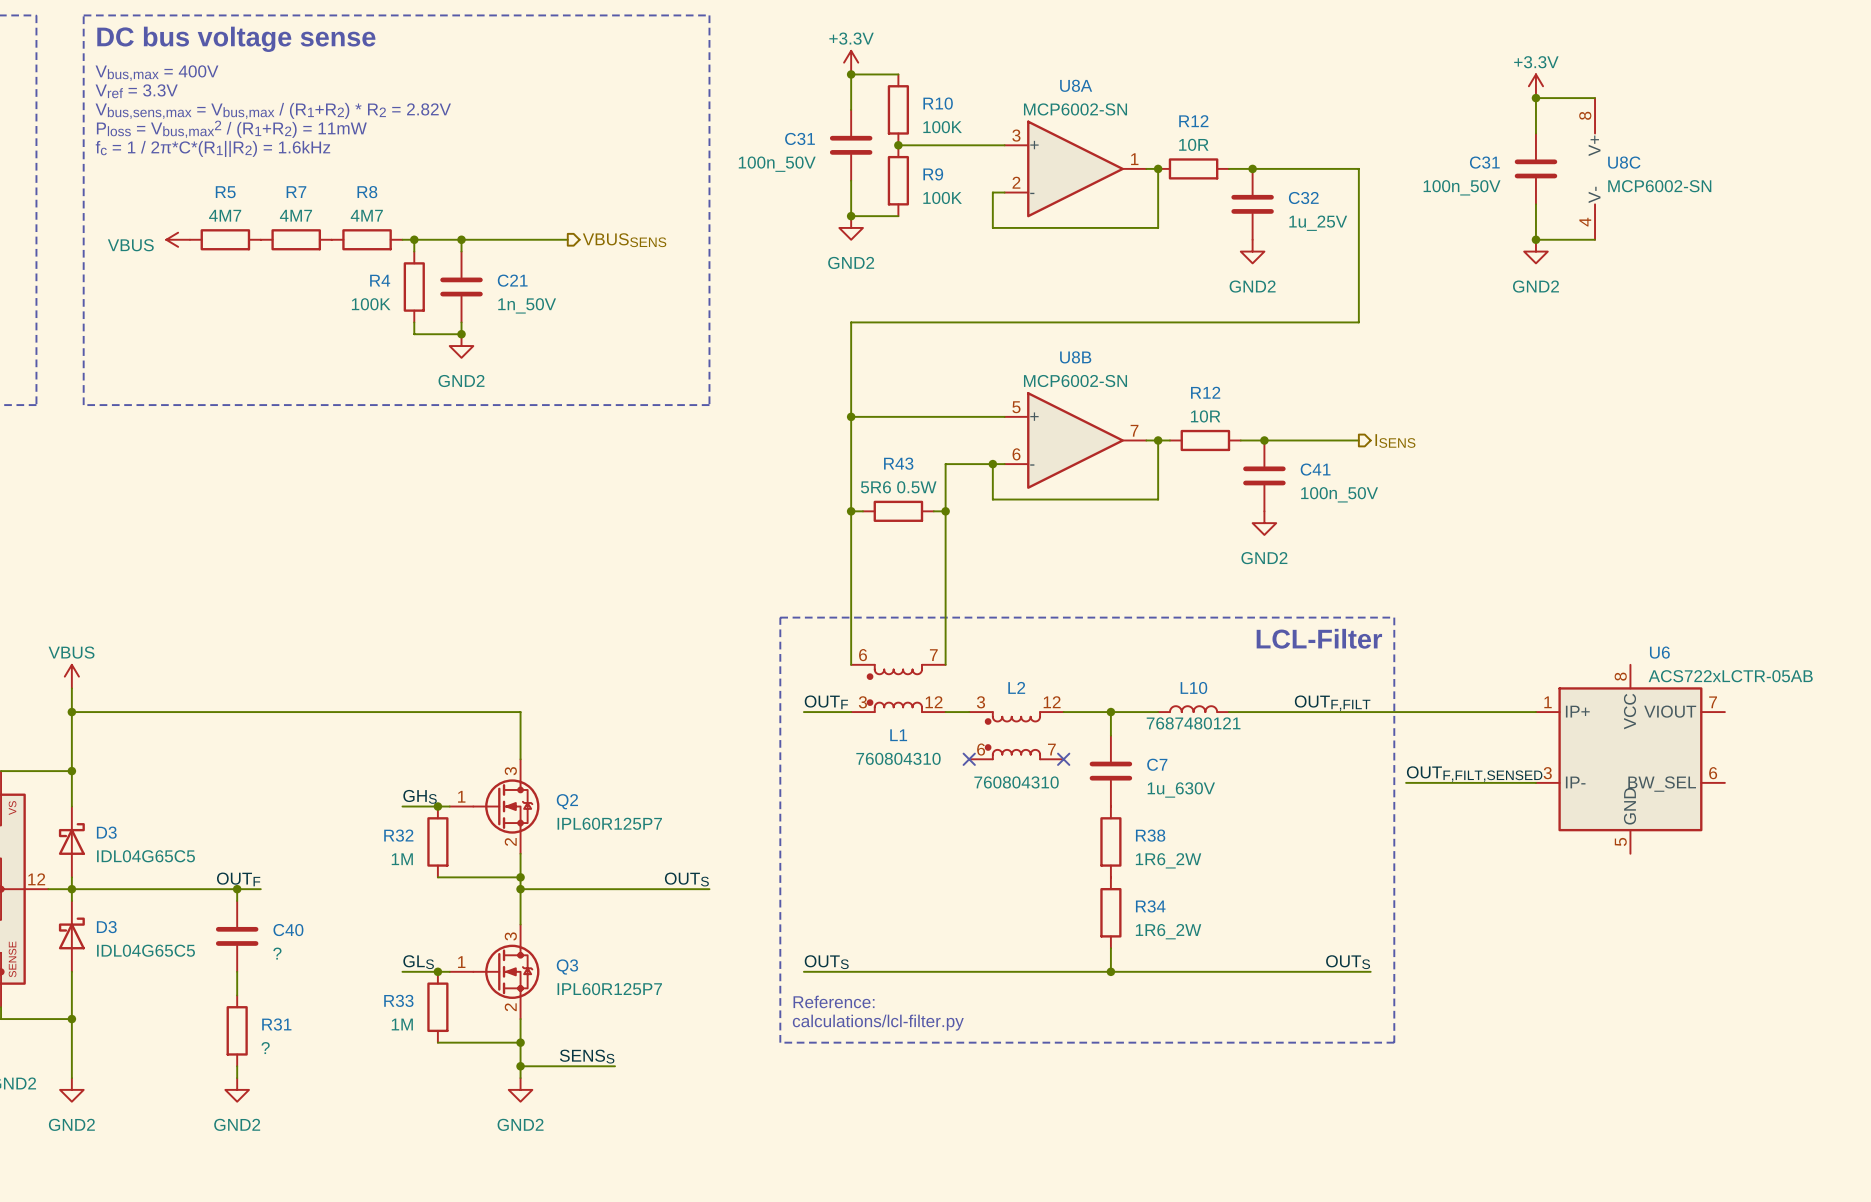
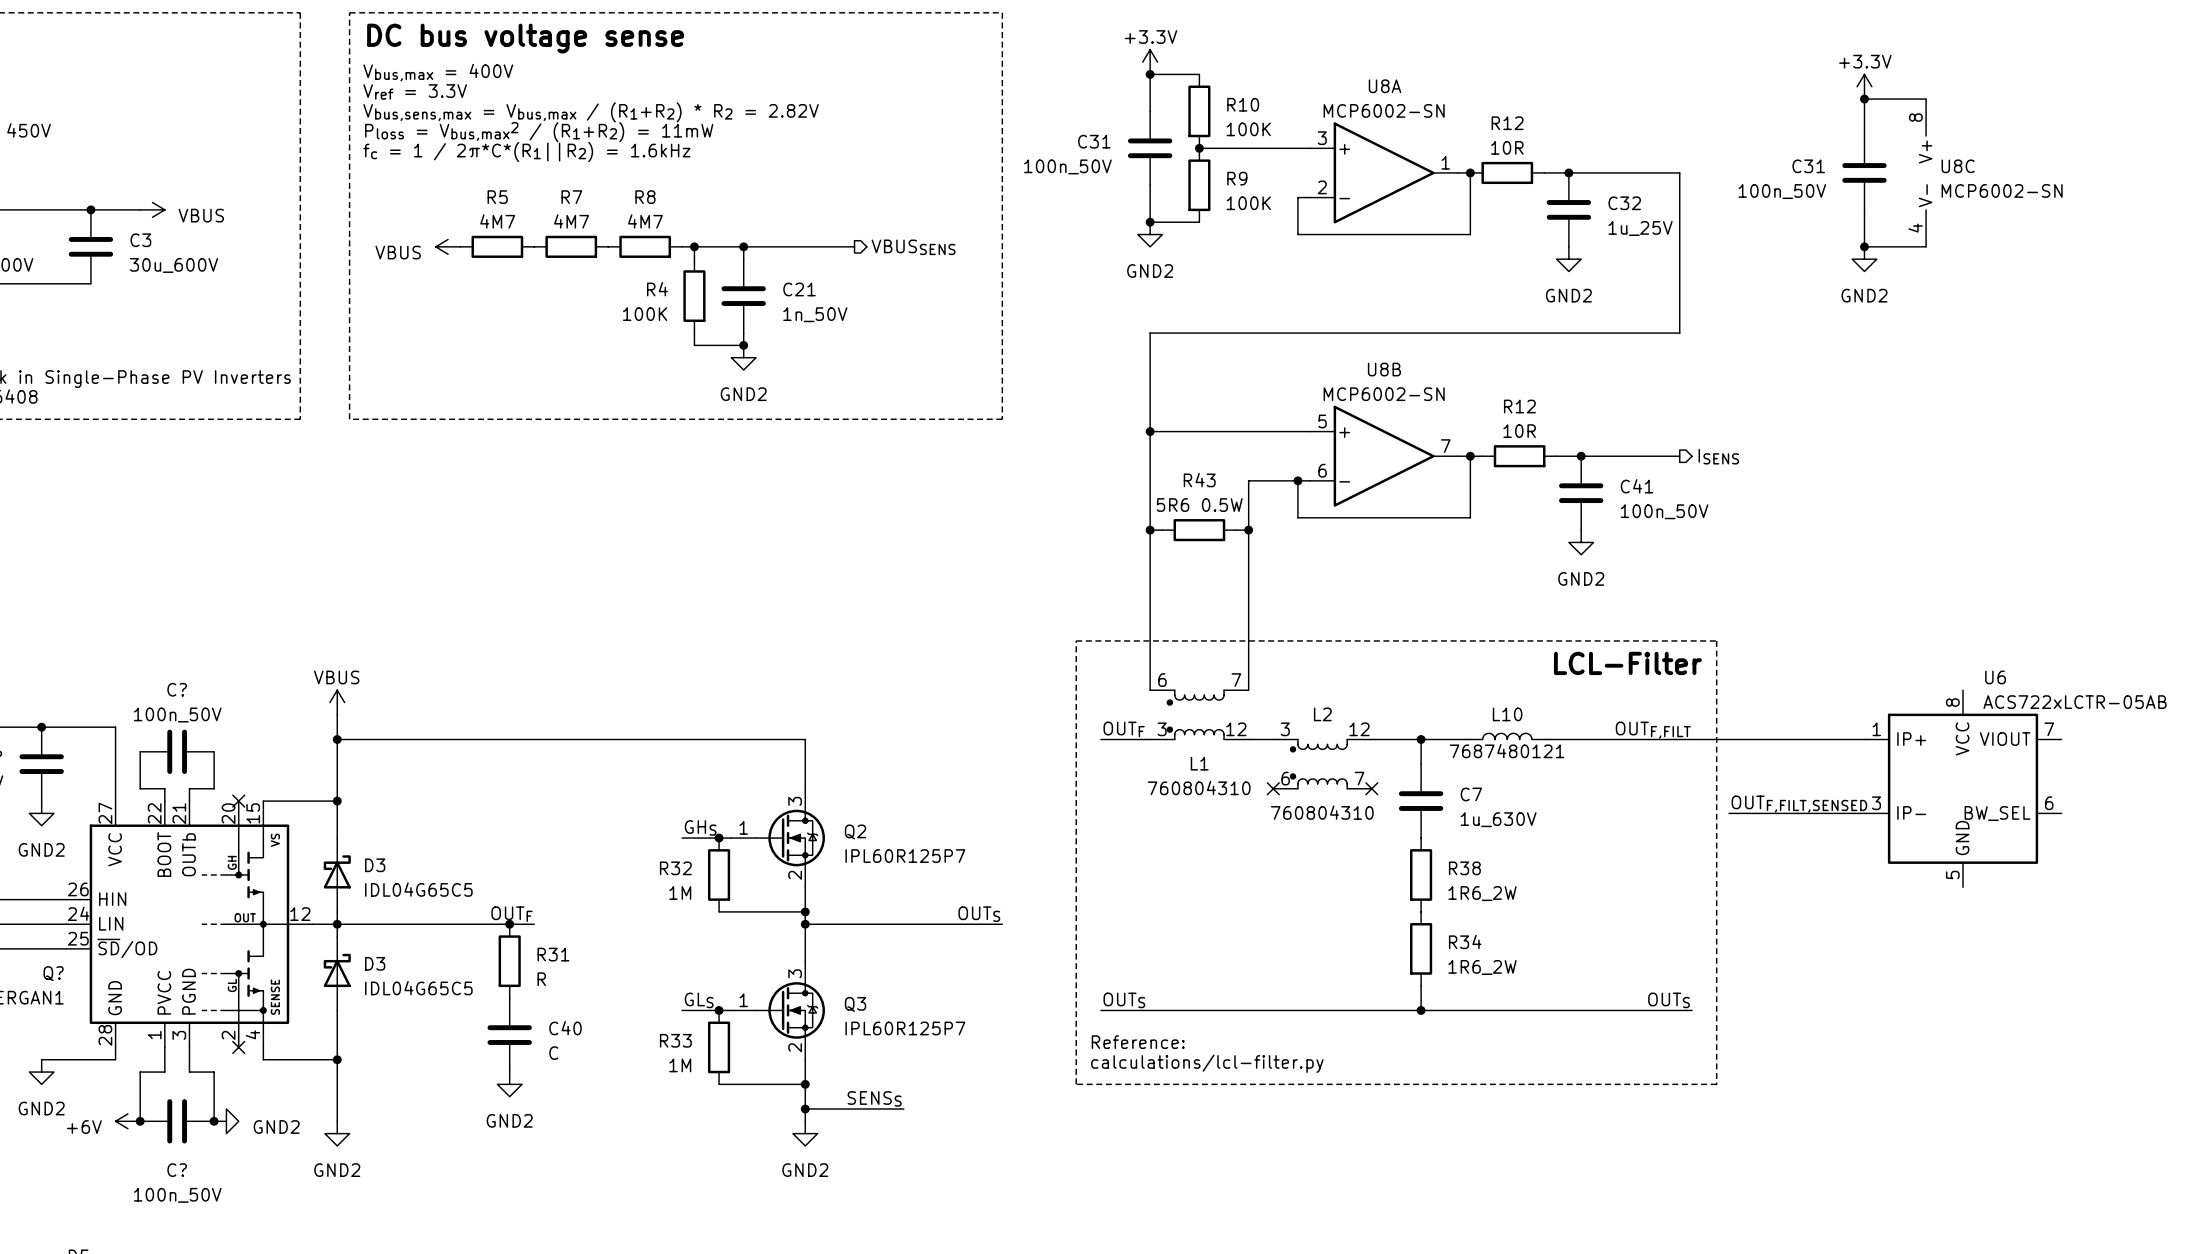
C40 position: (237, 936) -> (509, 1035)
C40 value: ? (277, 953) -> C (553, 1053)
R31 position: (237, 1030) -> (509, 961)
R31 value: ? (265, 1048) -> R (541, 979)
wire: (237, 1066) (237, 1078) -> none
power symbol position: GND2 (237, 1089) -> GND2 (509, 1084)

